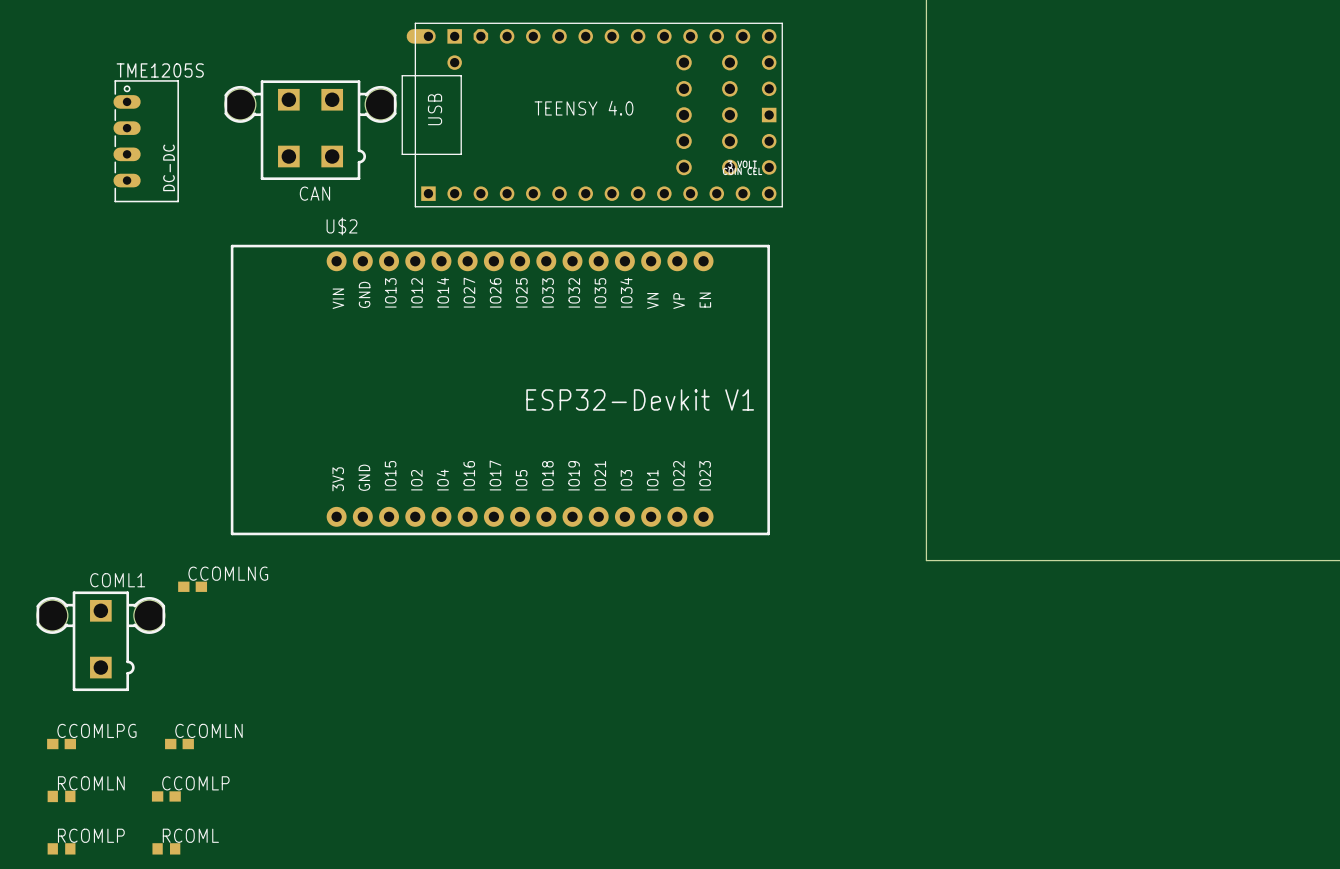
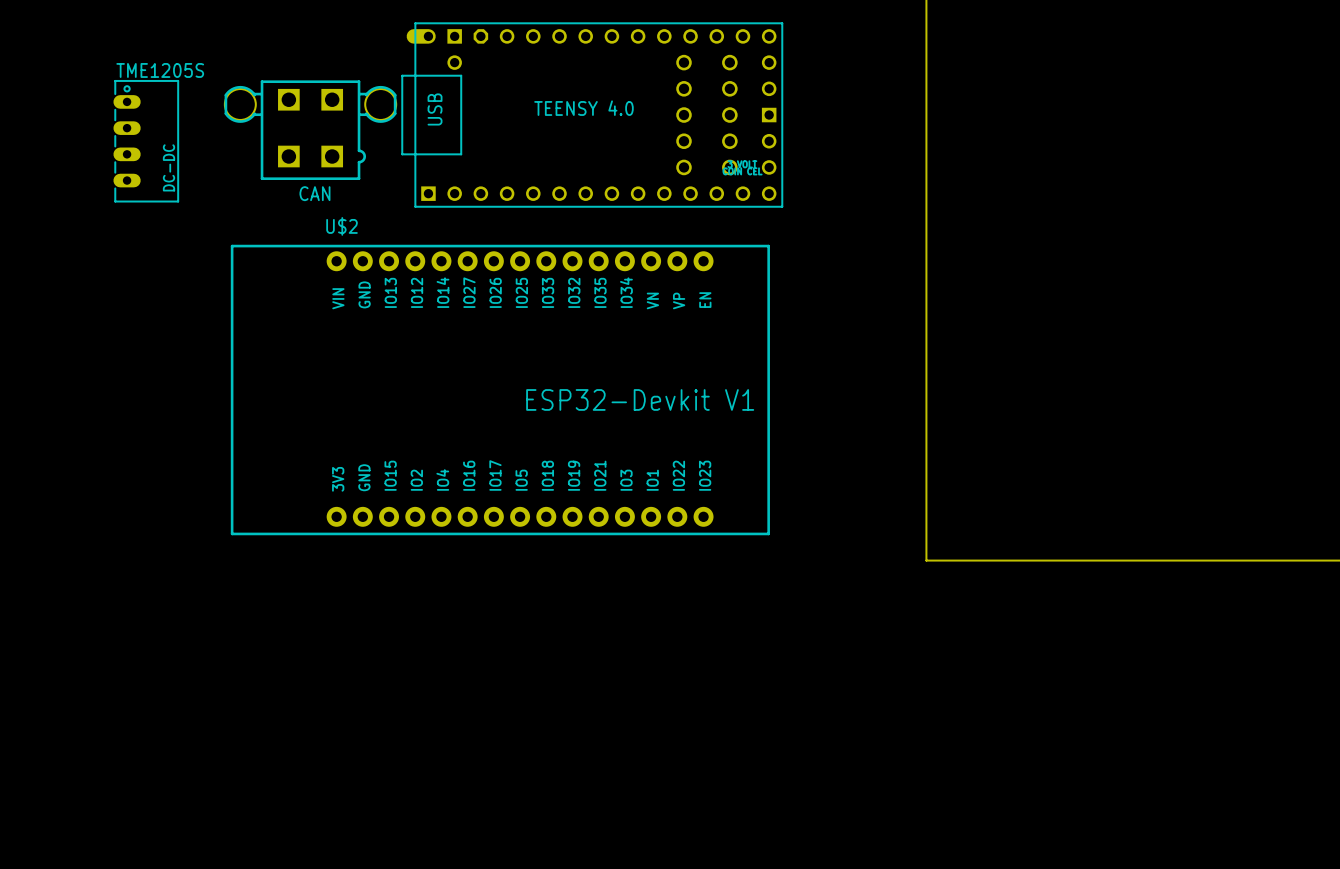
CCOMLNG: (192, 586) -> none
COML1: (100, 641) -> none
CCOMLPG: (61, 744) -> none
CCOMLN: (179, 744) -> none
RCOMLN: (61, 796) -> none
CCOMLP: (166, 796) -> none
RCOMLP: (61, 848) -> none
RCOML: (166, 848) -> none

